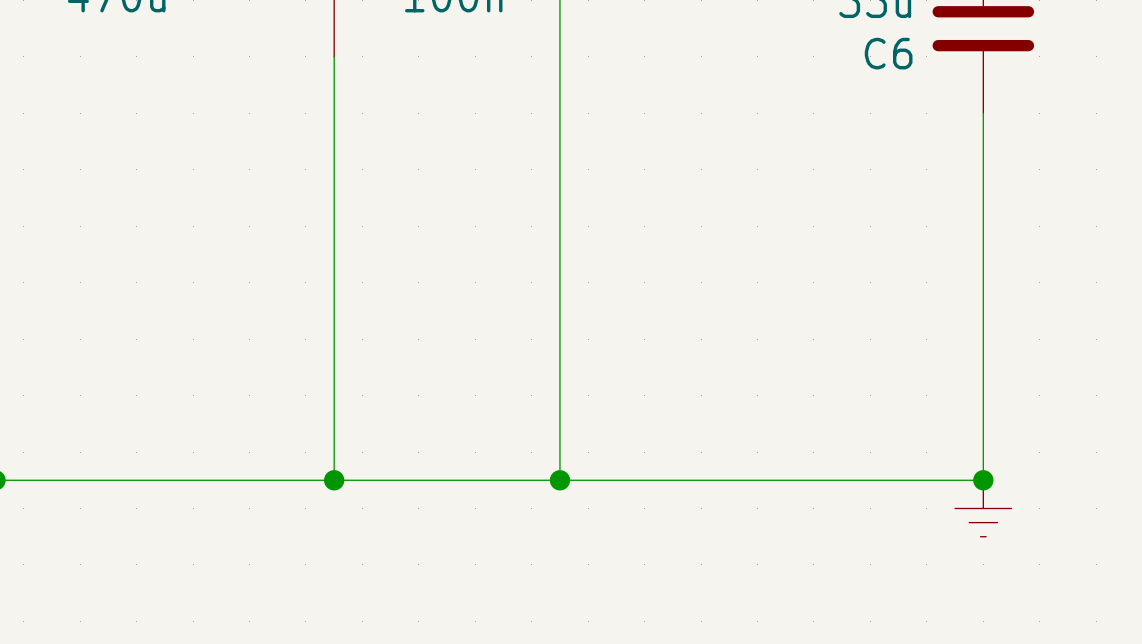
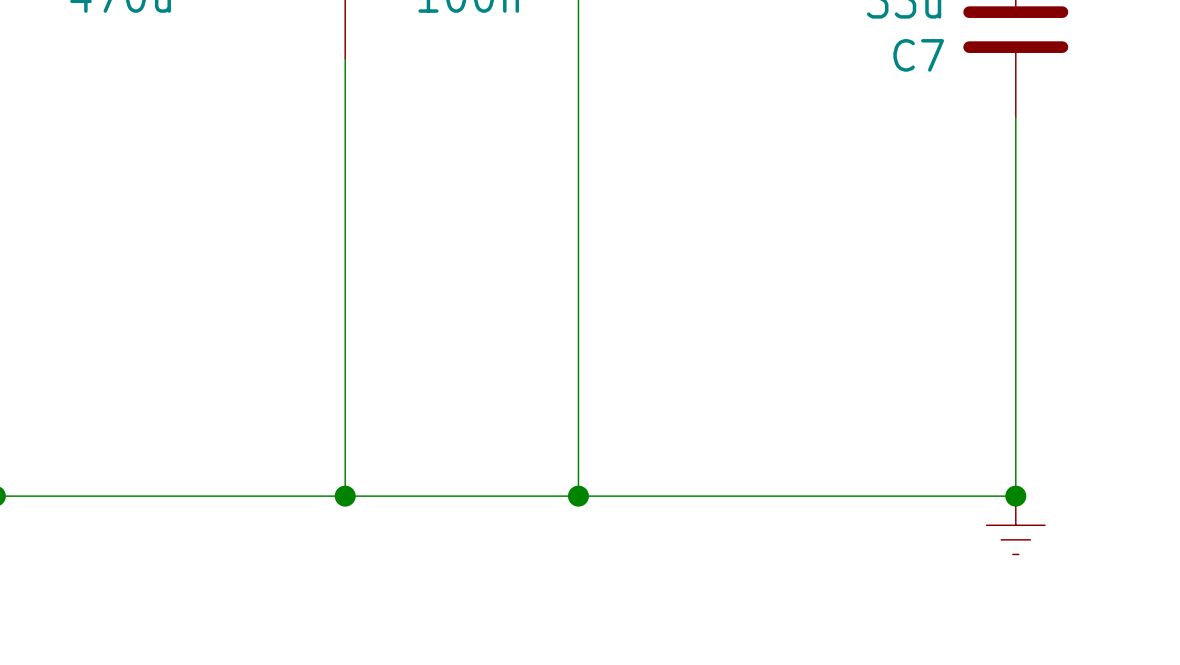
C6 name: C6 (888, 53) -> C7 (918, 55)

